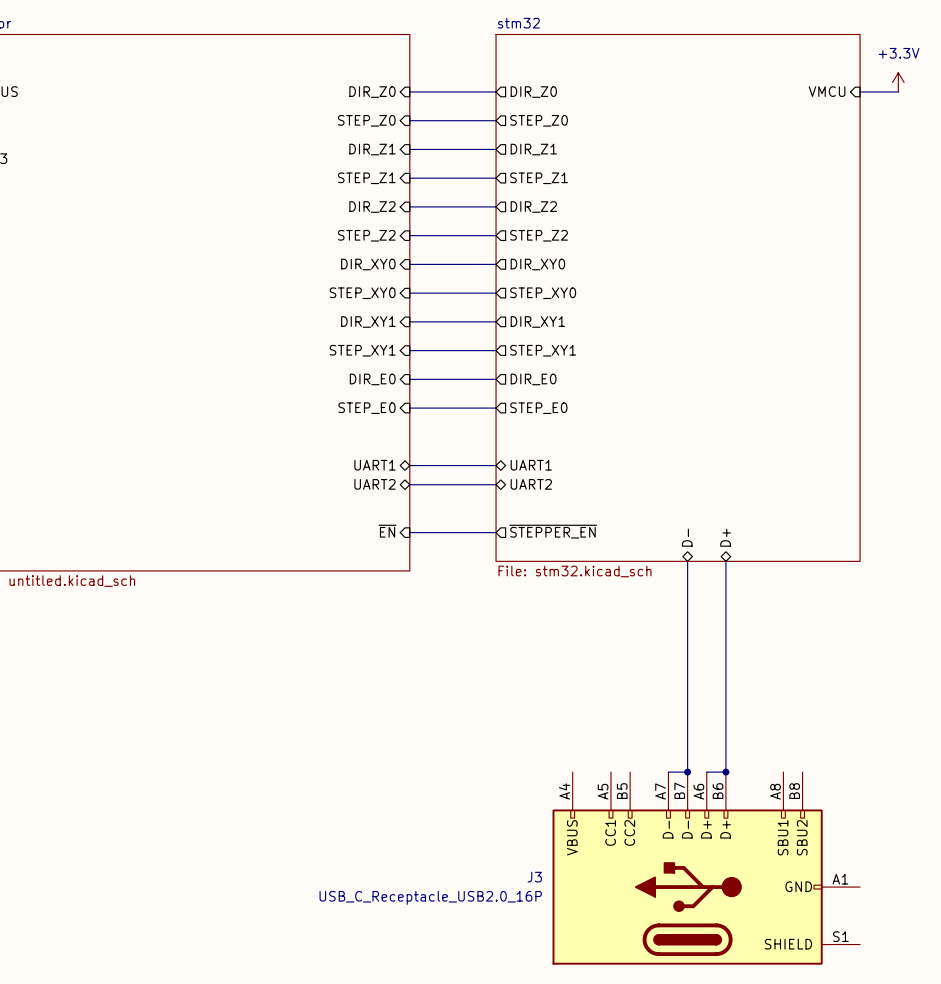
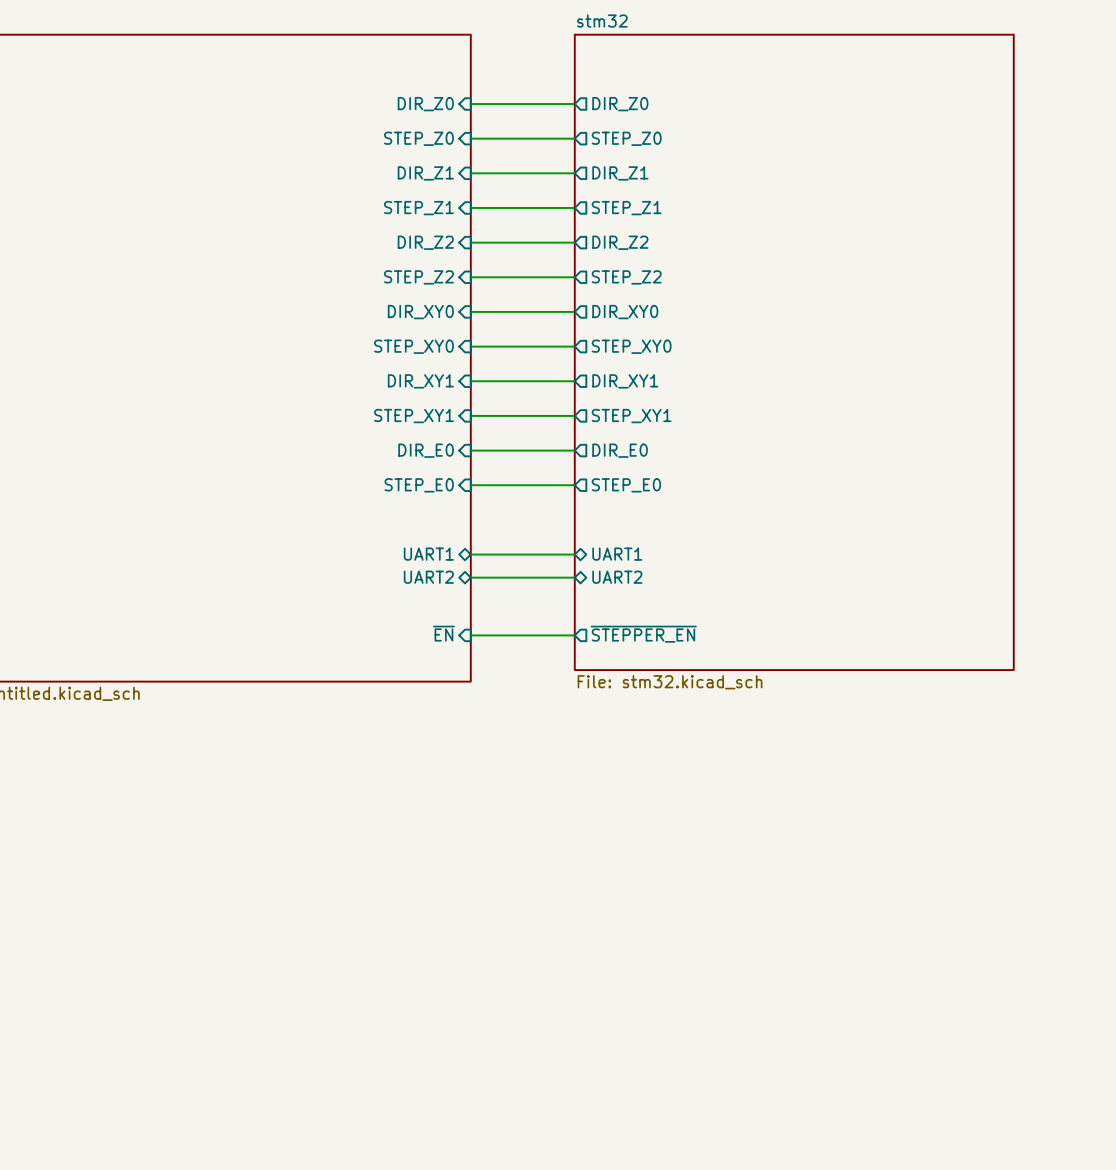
power symbol: +3.3V (898, 82) -> none
sheet pin: VMCU (827, 91) -> none
wire: (860, 91) (898, 91) -> none
sheet pin: D- (687, 537) -> none
sheet pin: D+ (725, 537) -> none
wire: (687, 561) (687, 772) (668, 772) -> none
wire: (725, 561) (725, 772) (706, 772) -> none
junction: (687, 772) -> none
junction: (725, 772) -> none
J3: USB_C_Receptacle_USB2.0_16P (706, 868) -> none

